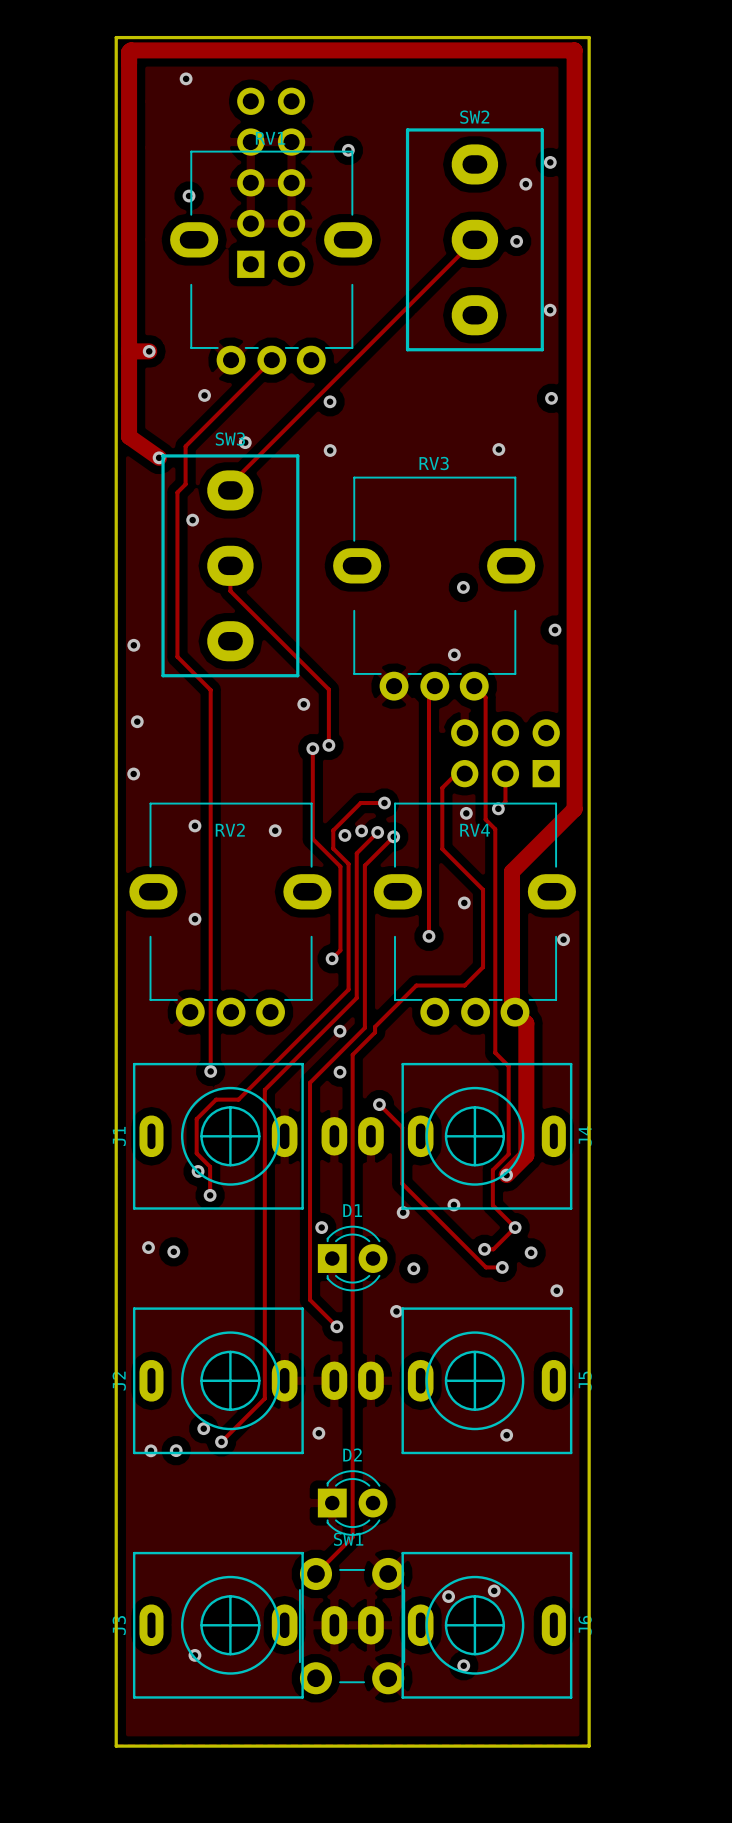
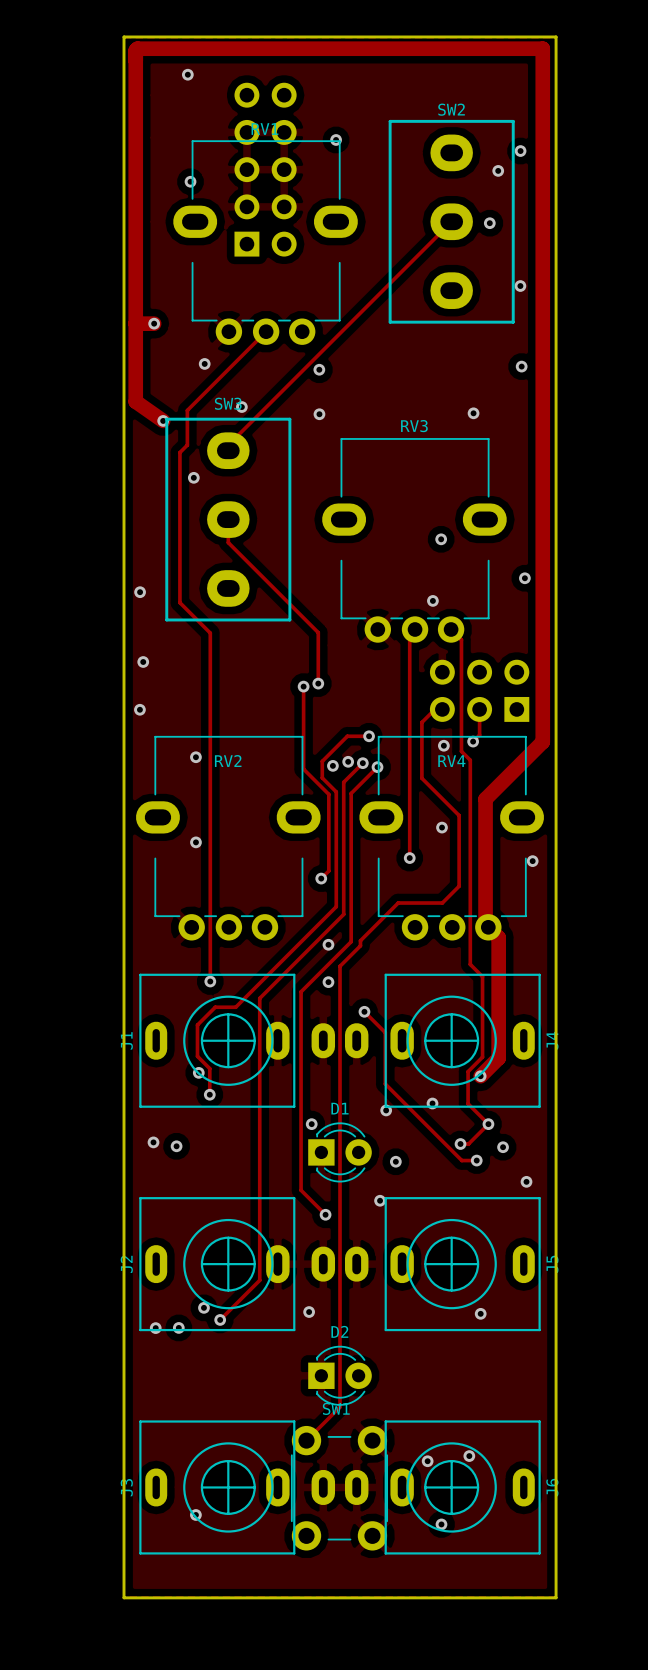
via: (303, 704) -> none
via: (275, 830) -> none

